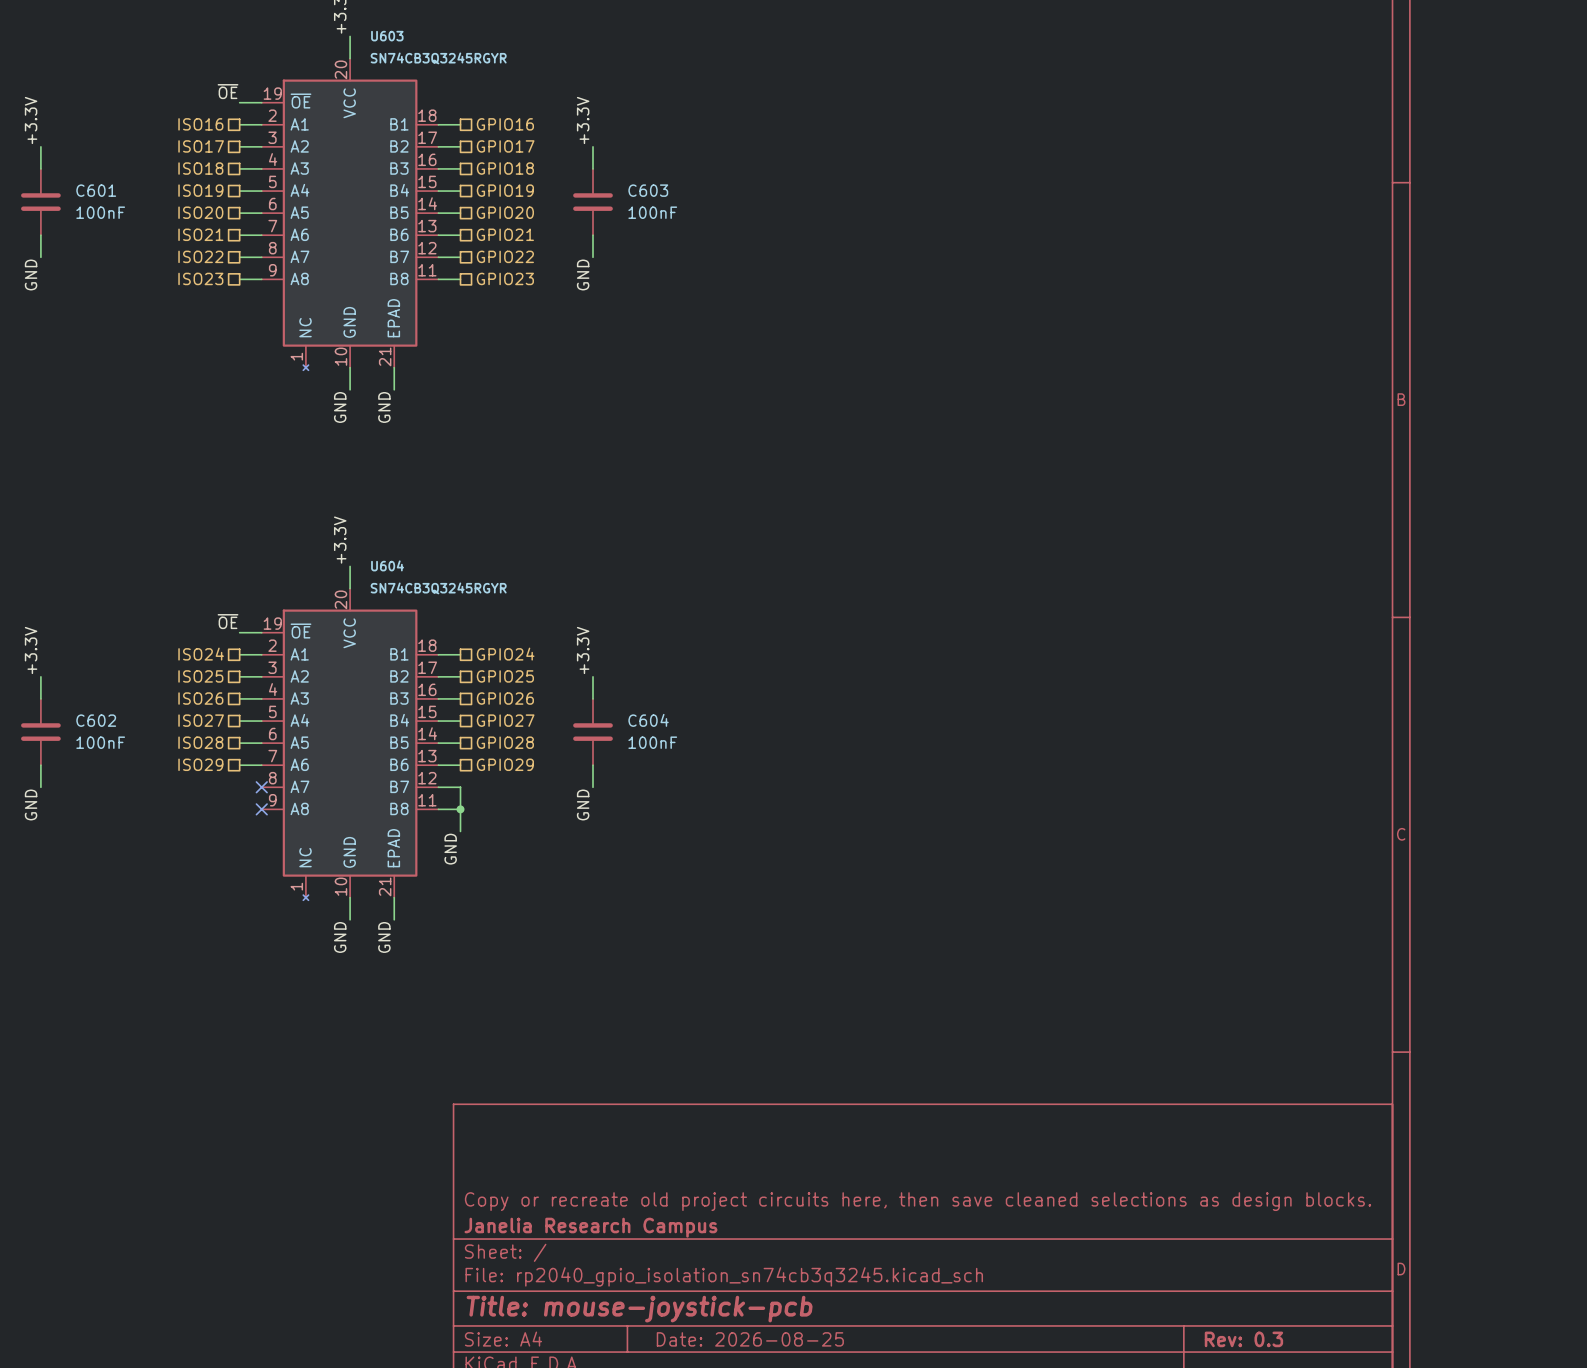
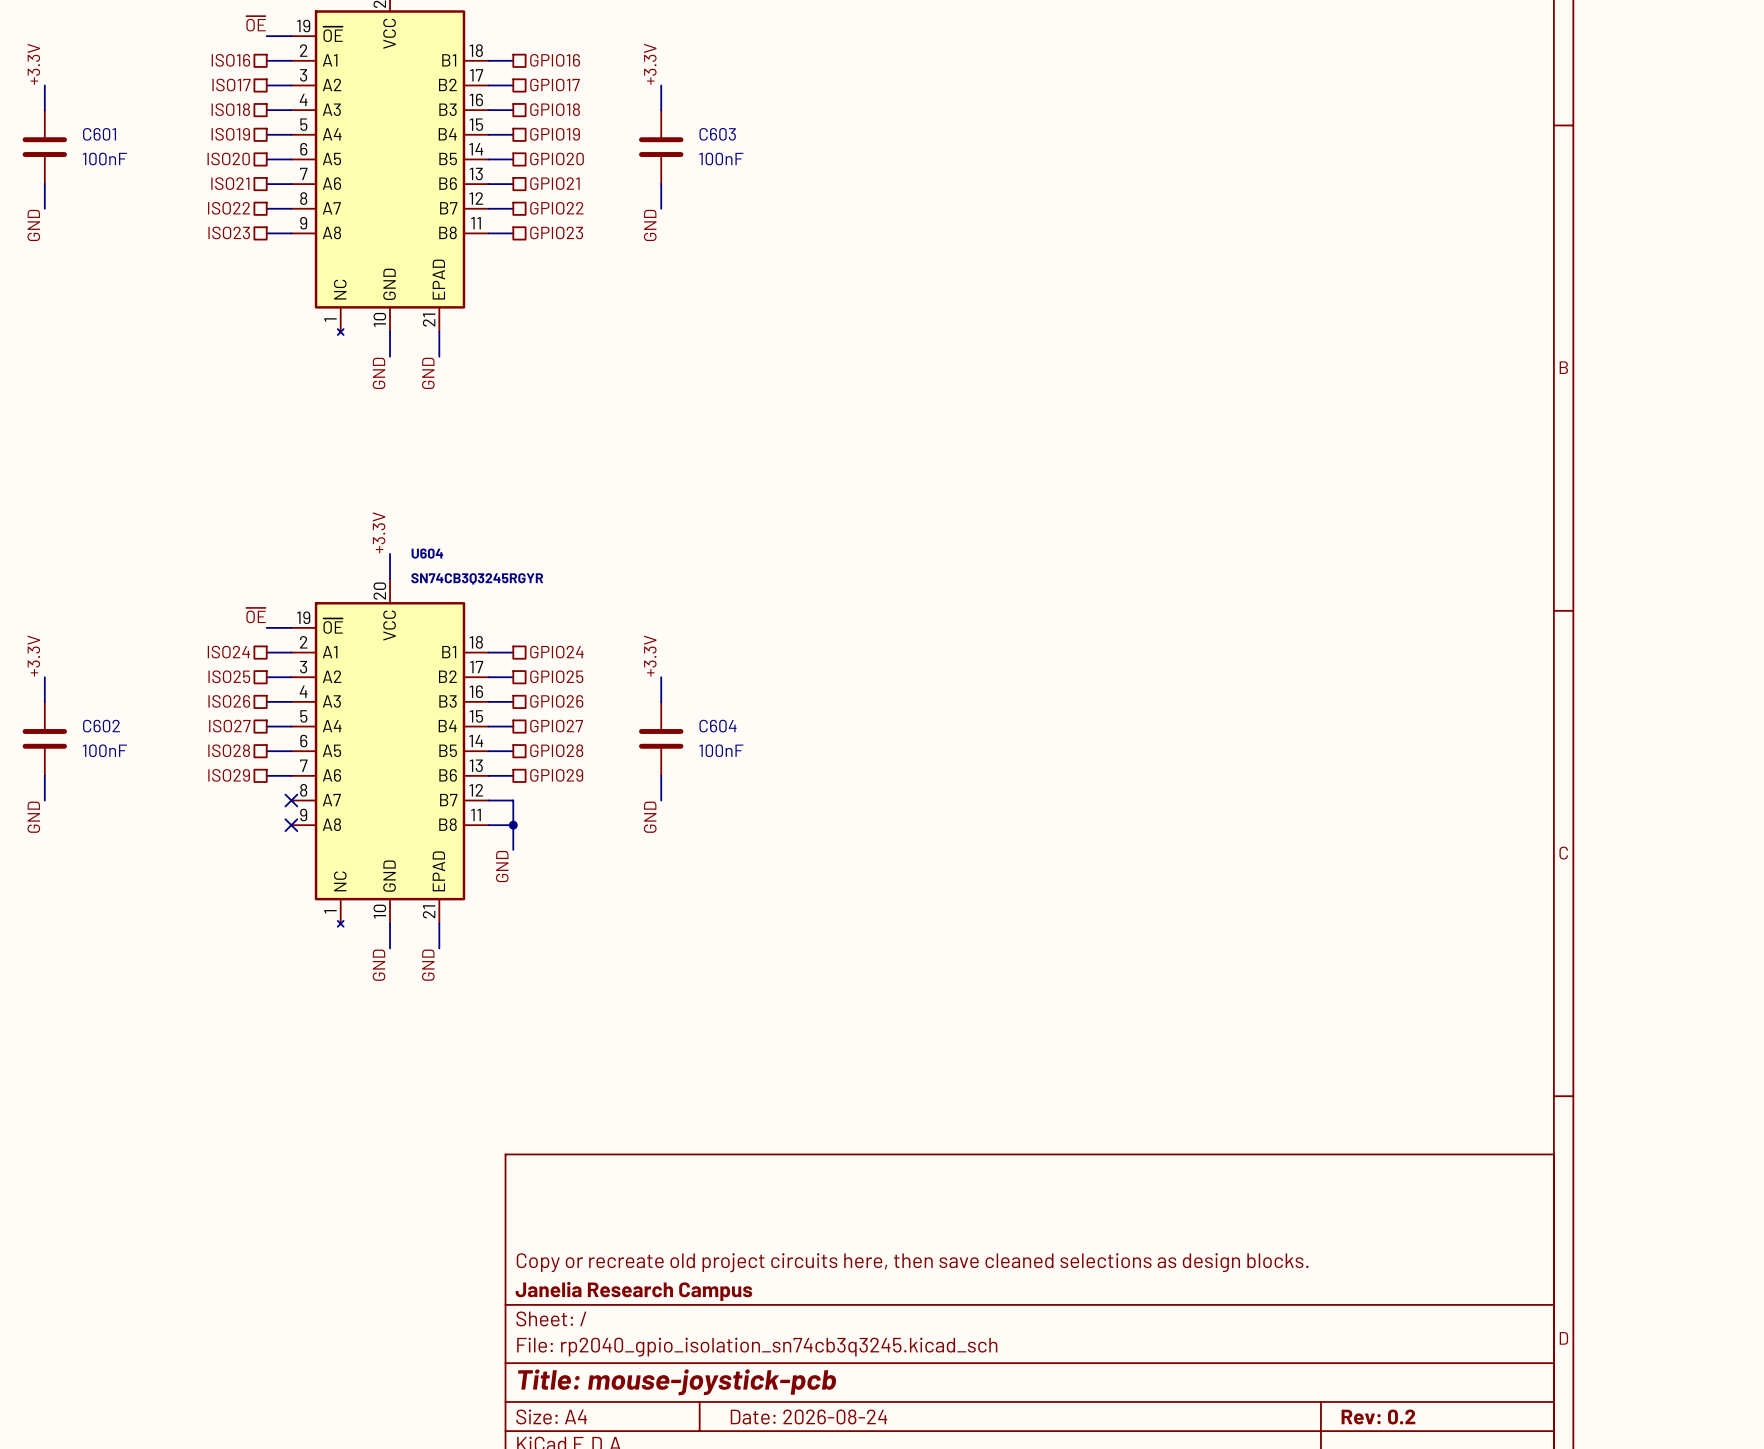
title block: Date: 2026-08-25 (750, 1339) -> Date: 2026-08-24 (809, 1416)
title block: Rev: 0.3 (1243, 1339) -> Rev: 0.2 (1378, 1417)

